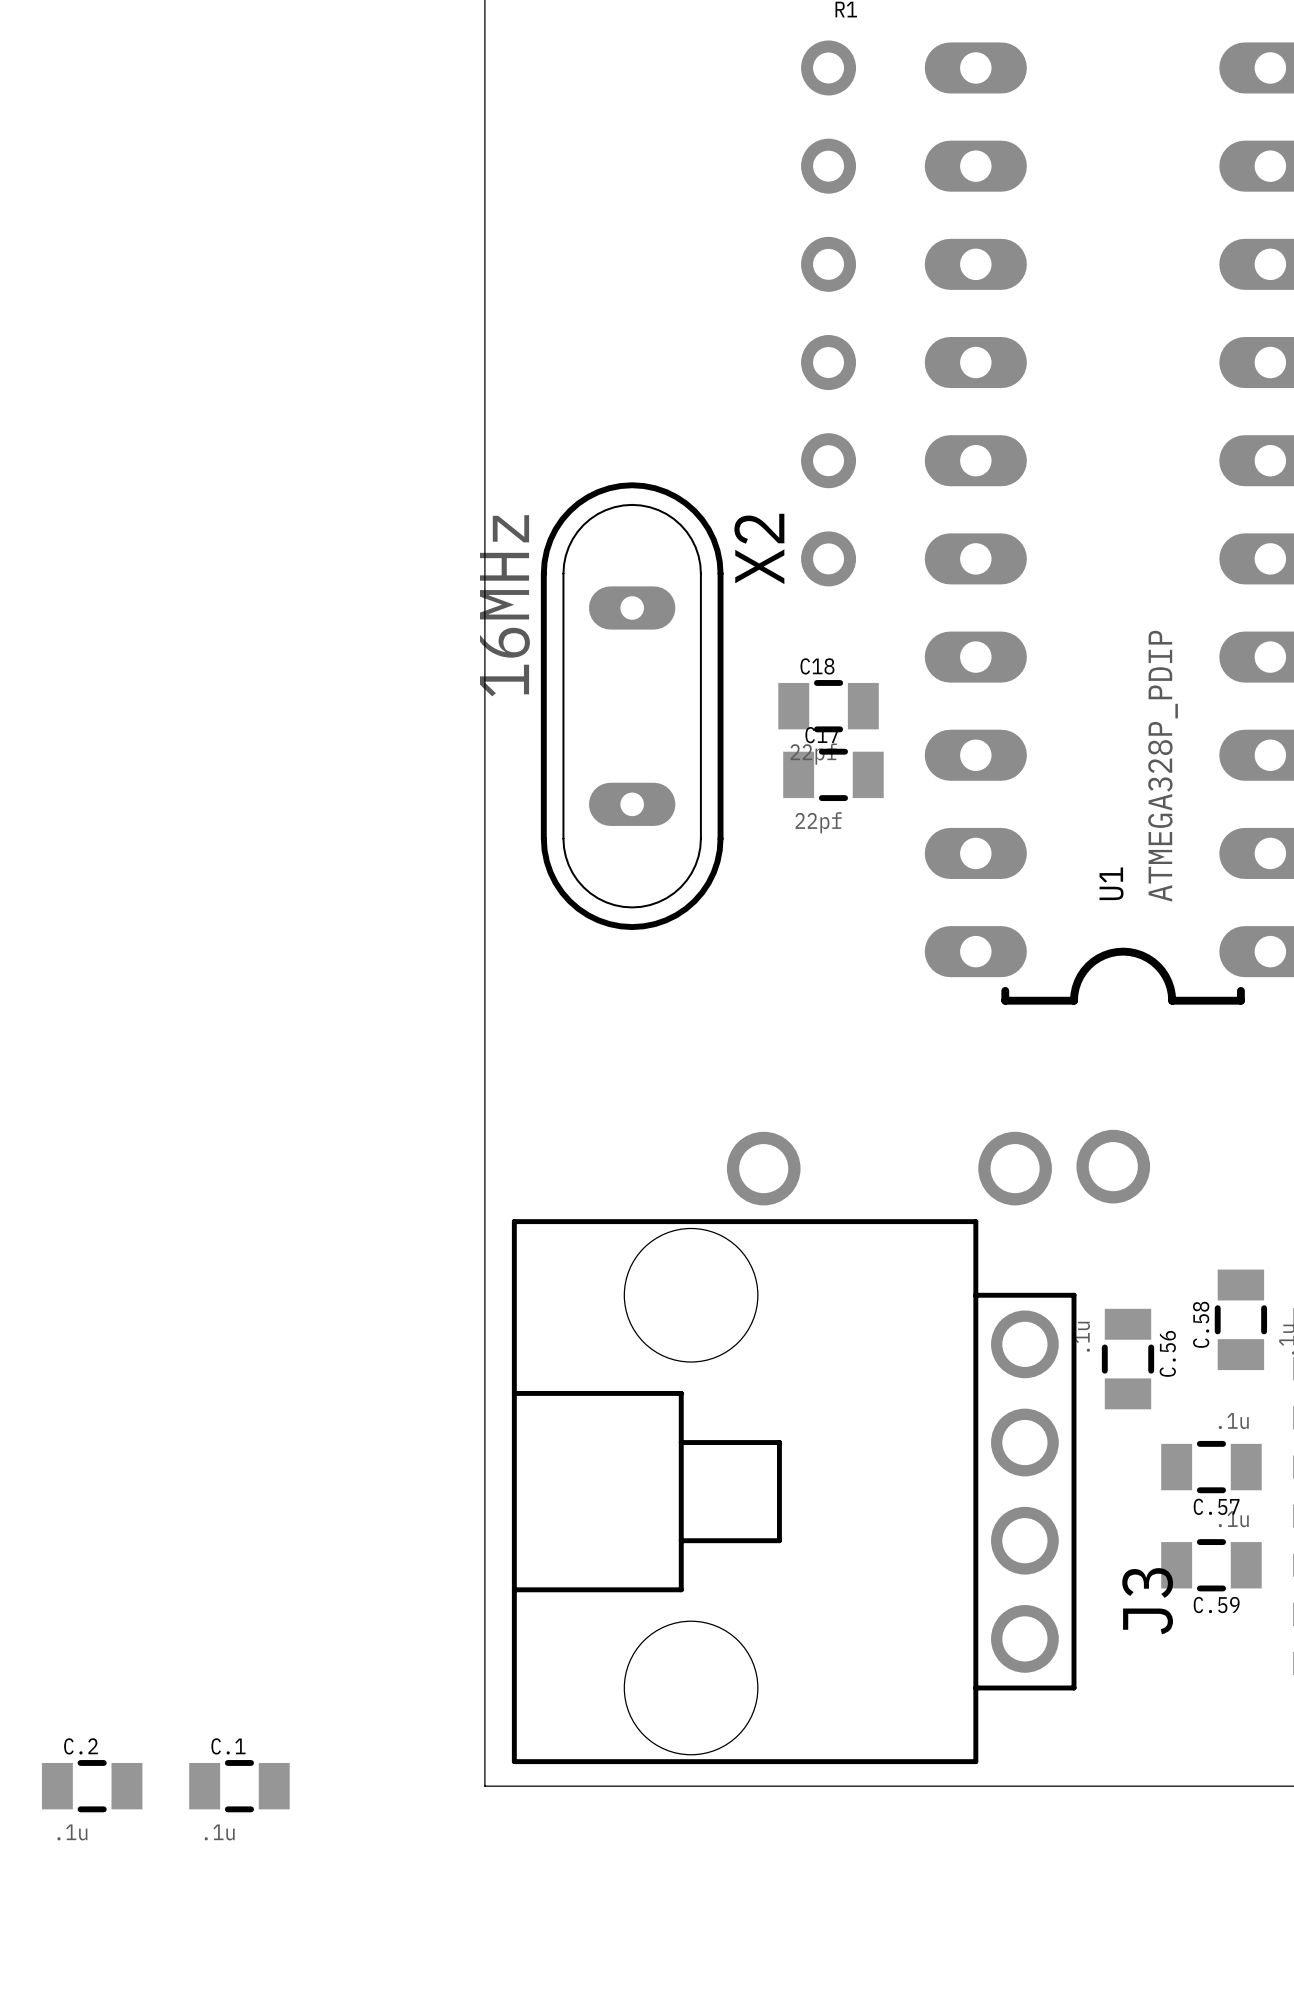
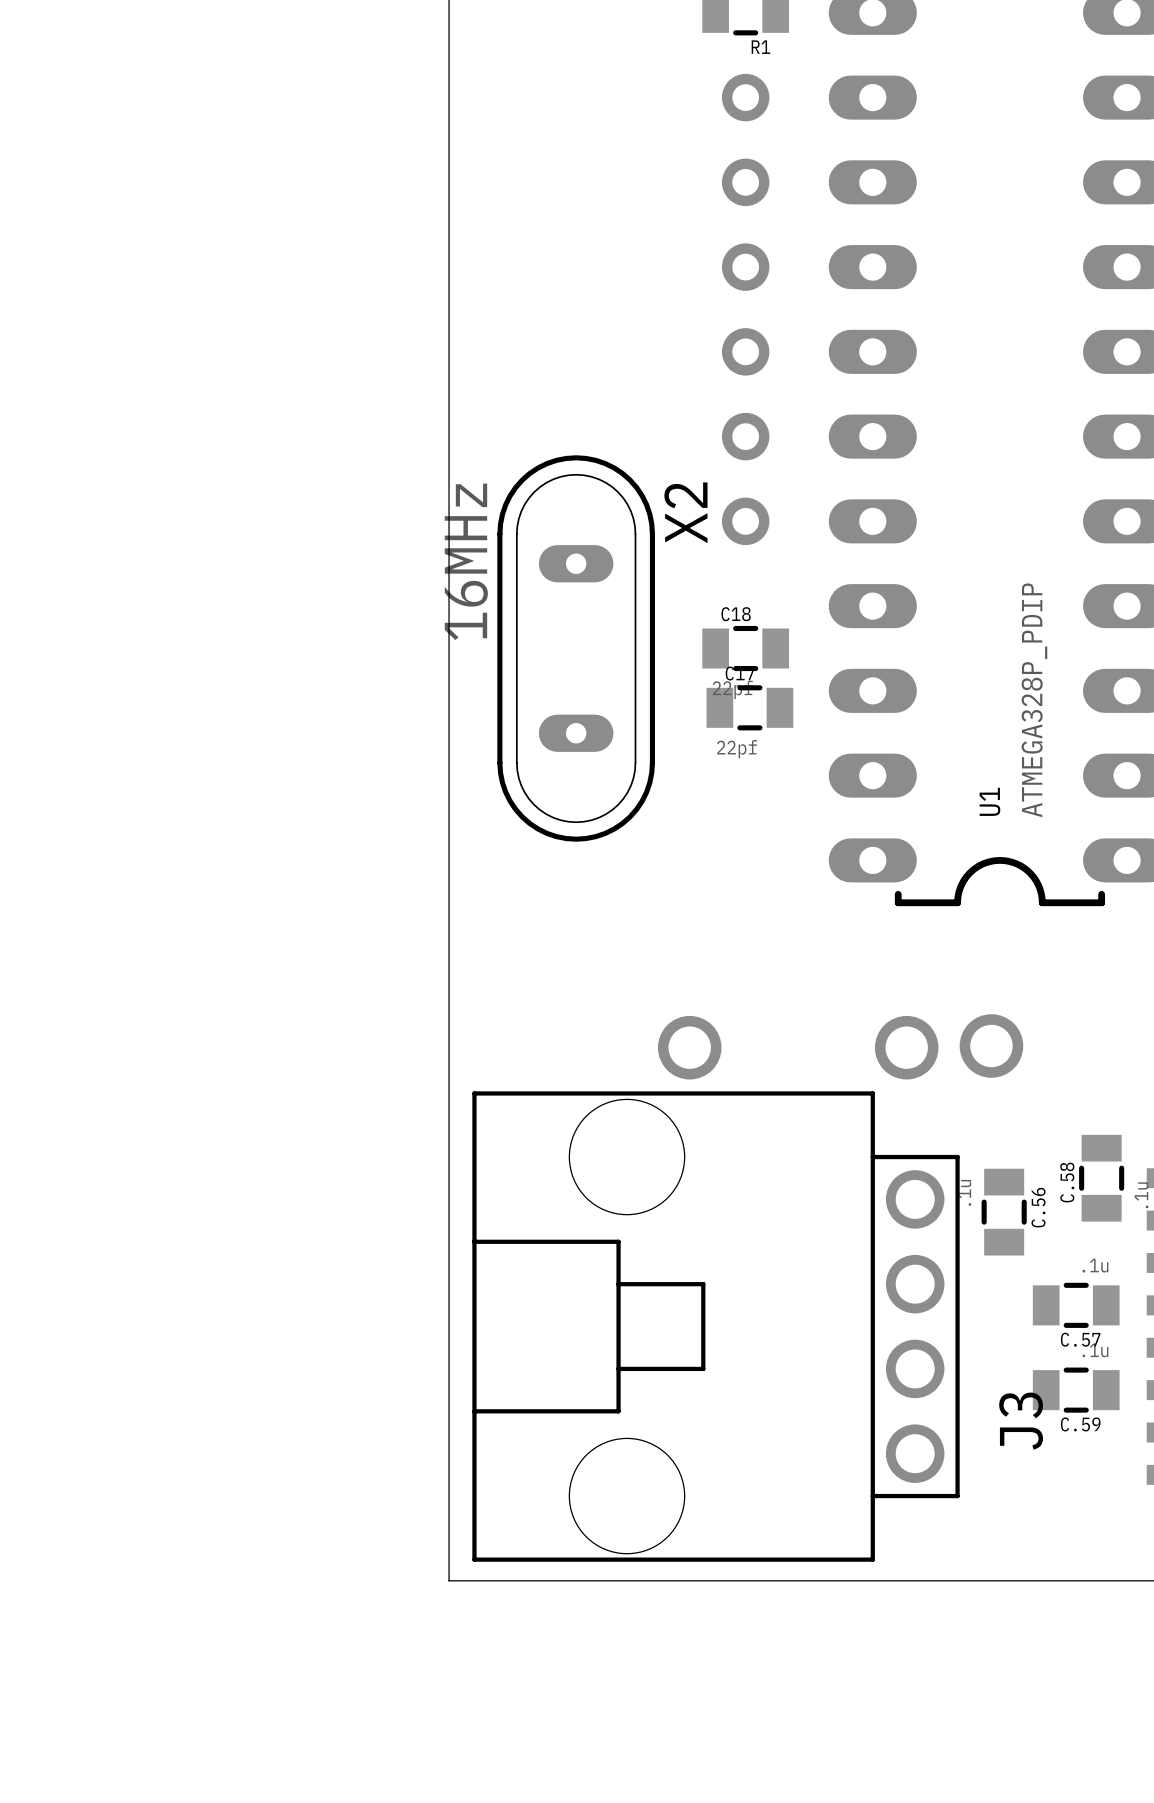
C.2: .1u (92, 1786) -> none
C.1: .1u (239, 1786) -> none

